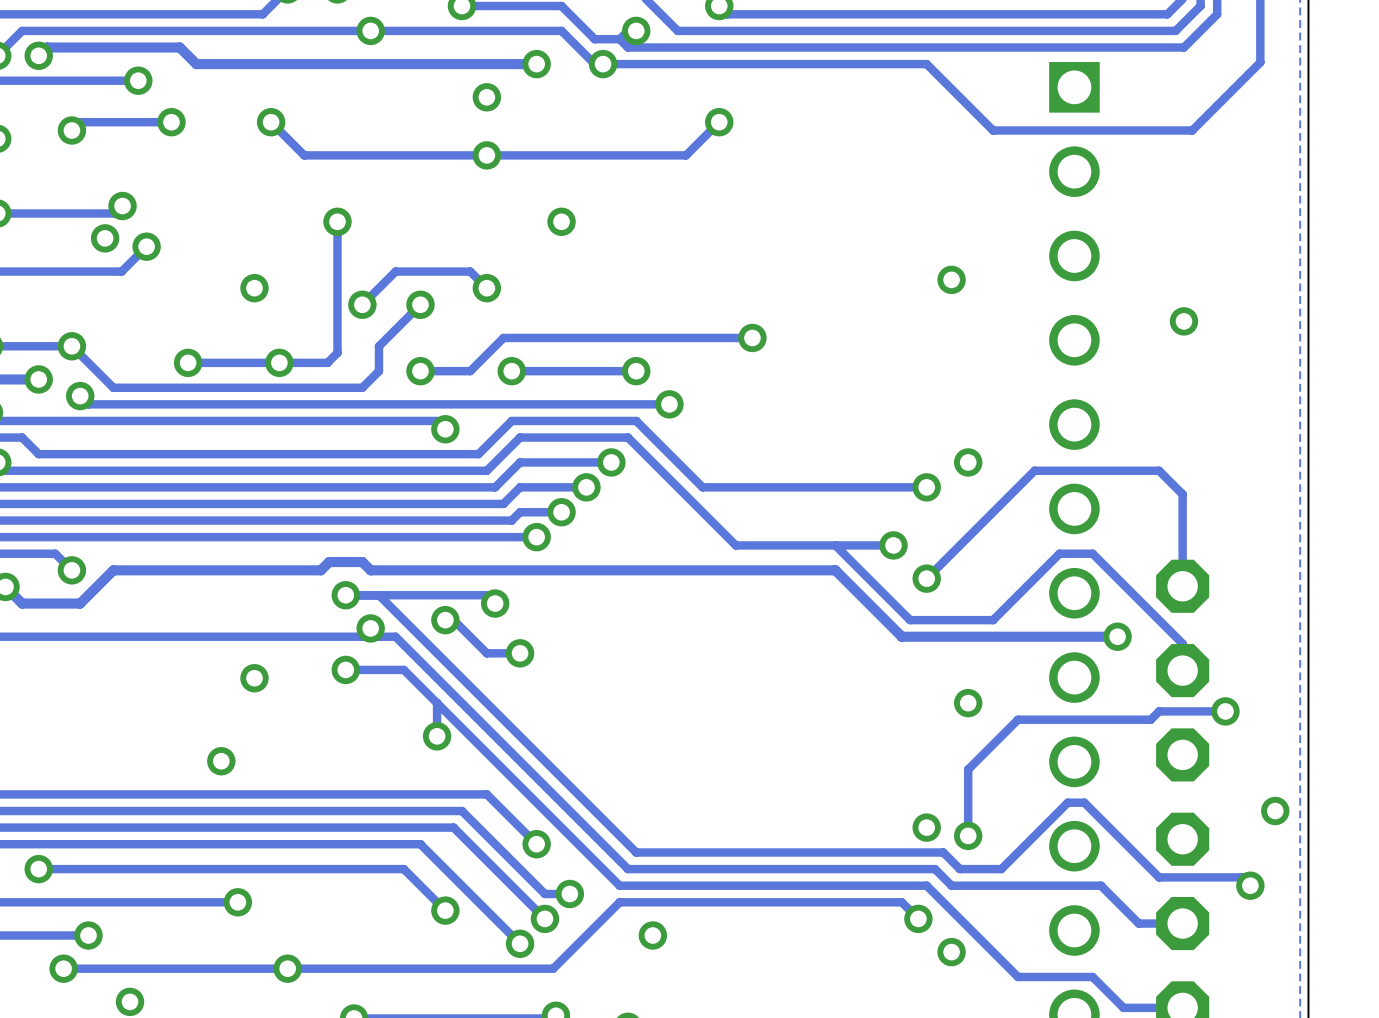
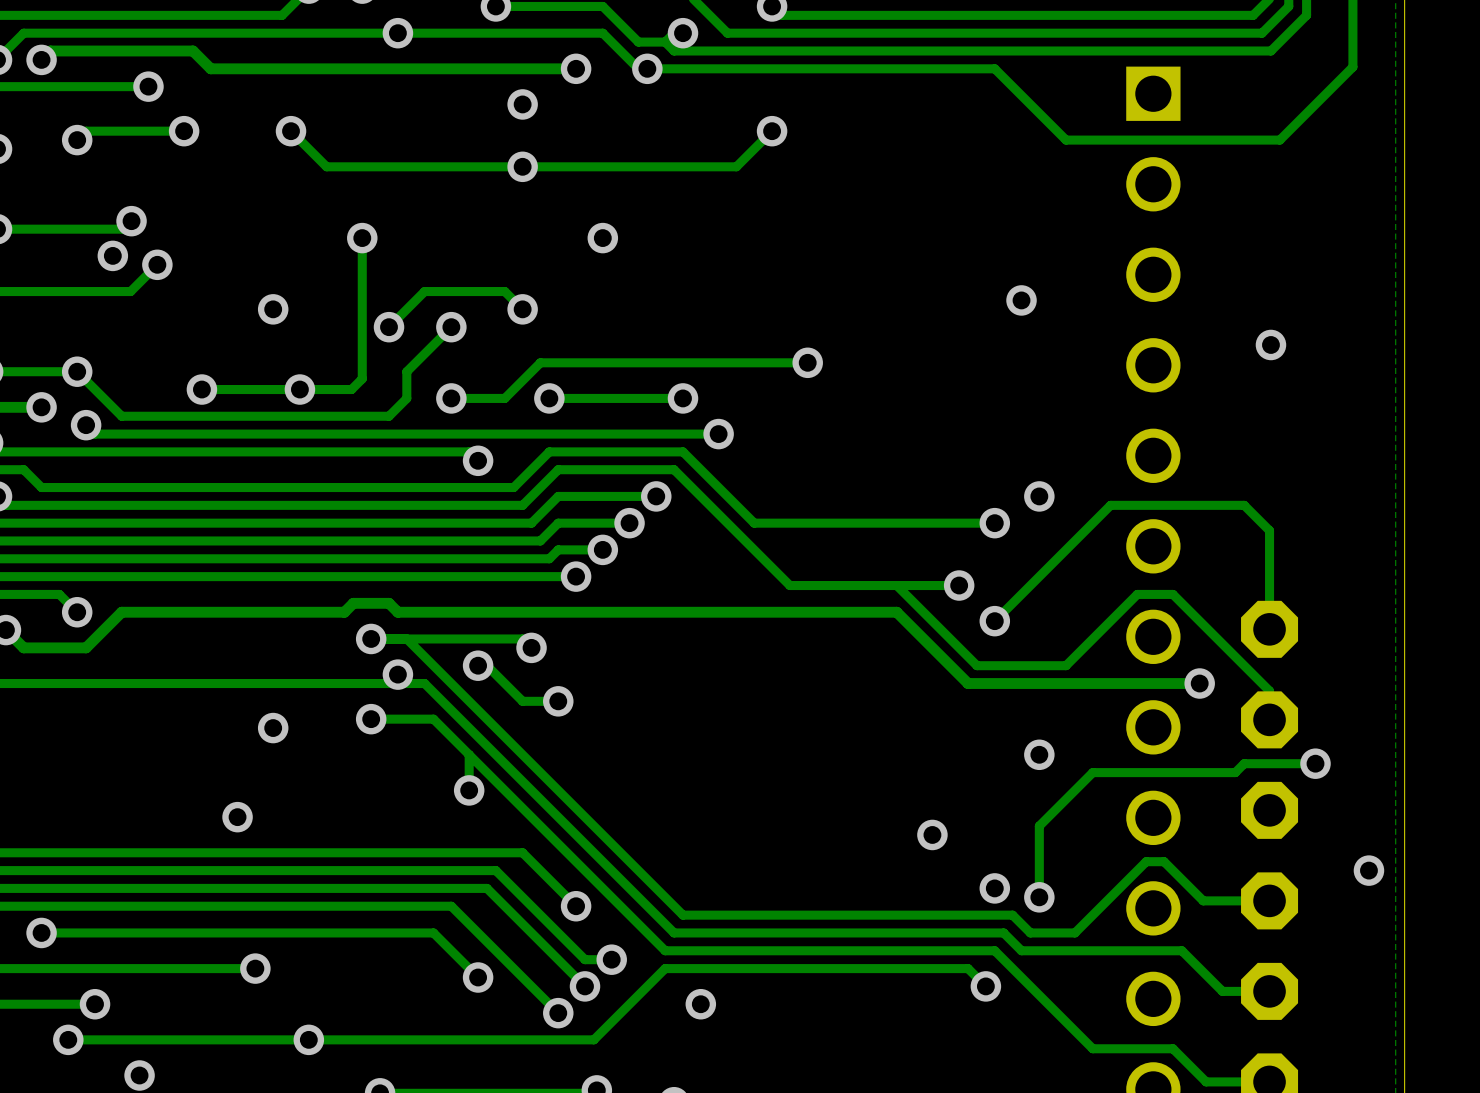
track: (1120, 839) (1159, 877) (1242, 877) (1250, 885) -> (1203, 900) (1269, 900)
via: (1250, 885) -> none
via position: (951, 952) -> (932, 834)

